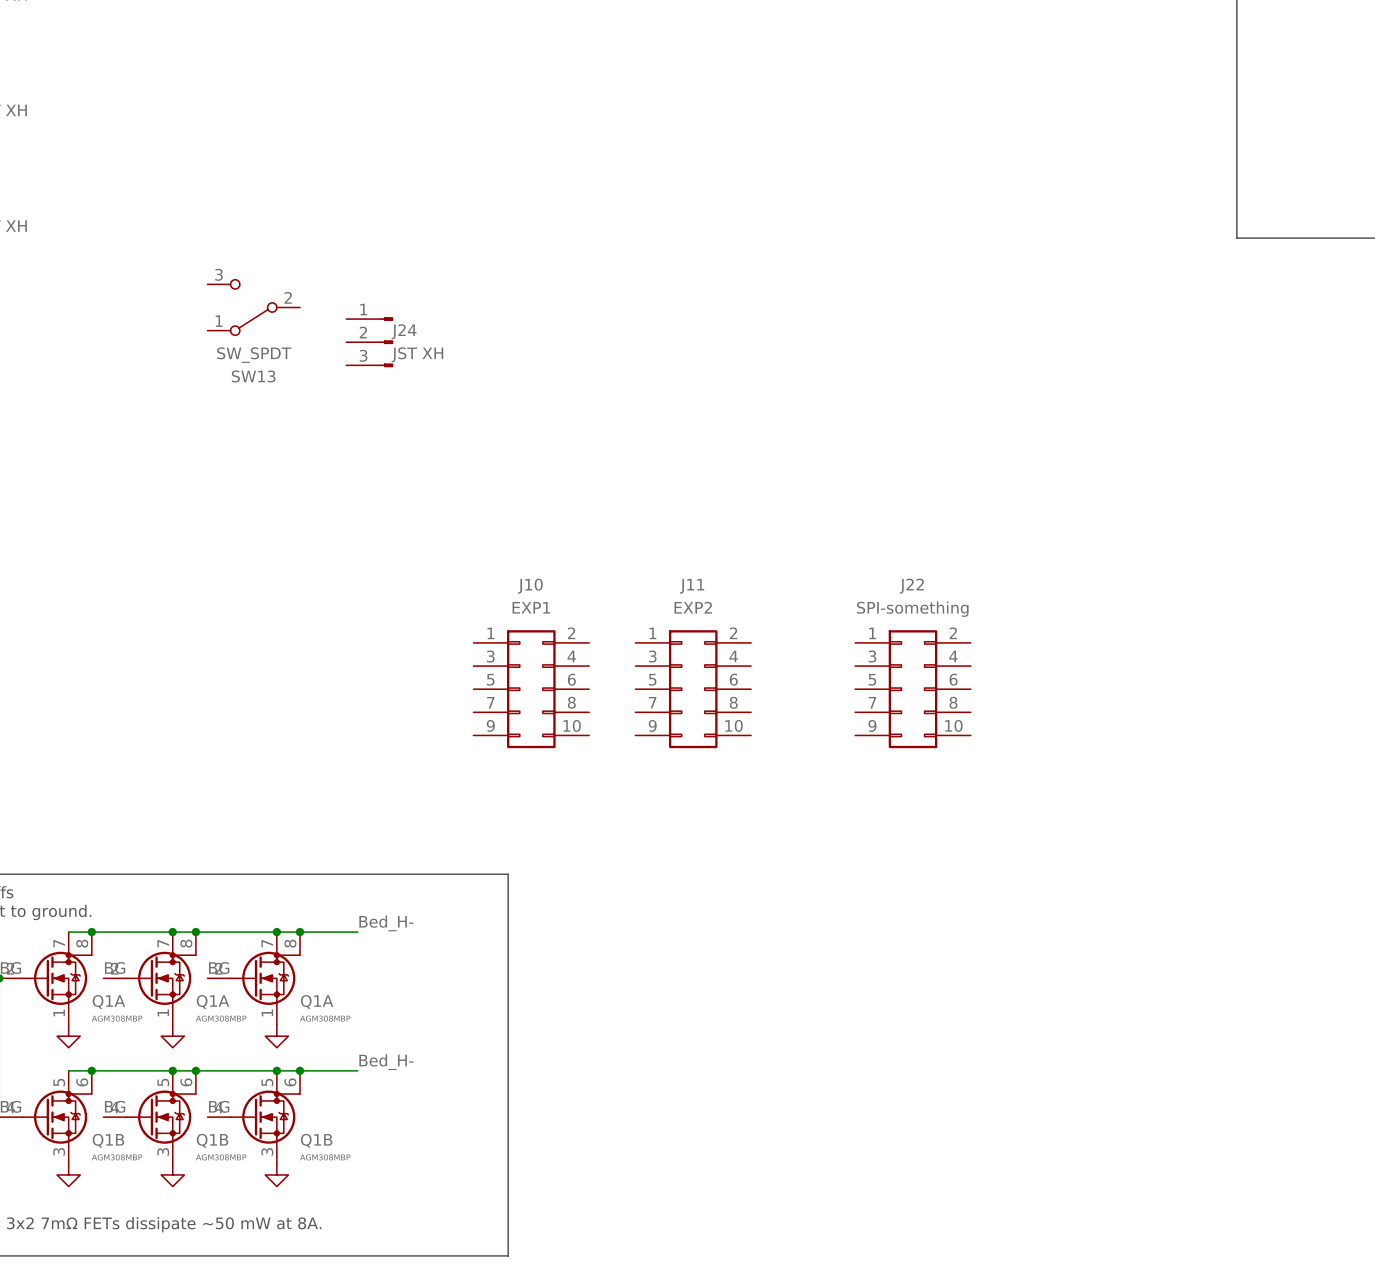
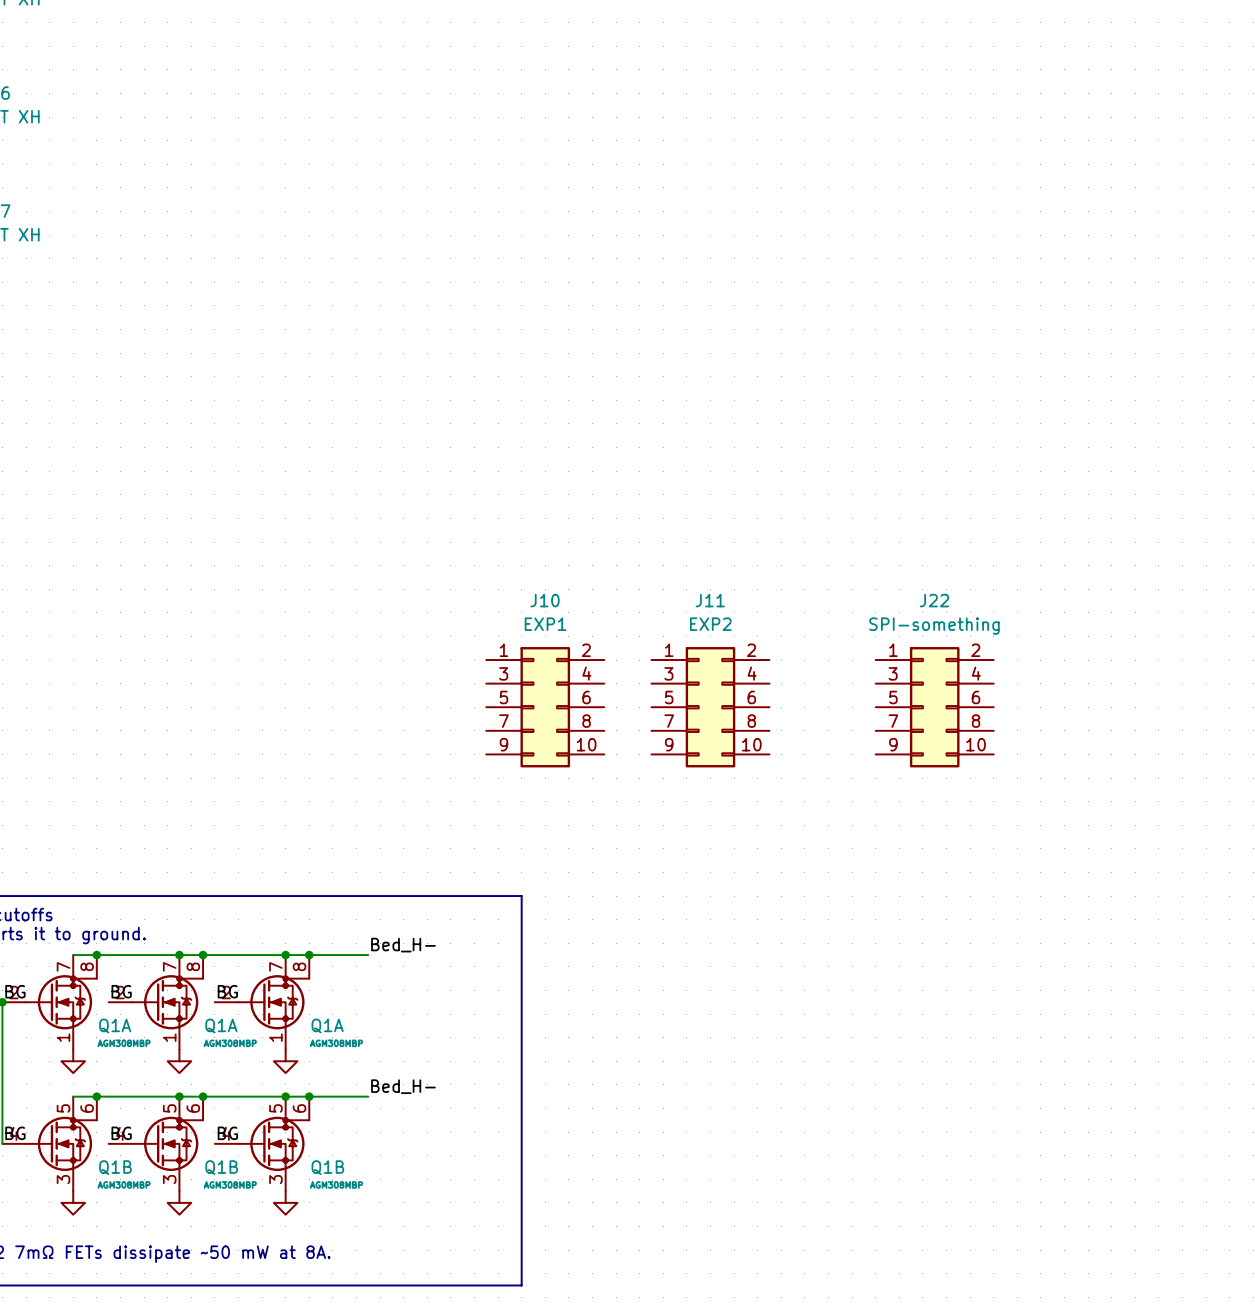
SW13: SW_SPDT (253, 307) -> none
J24: JST XH (369, 342) -> none

